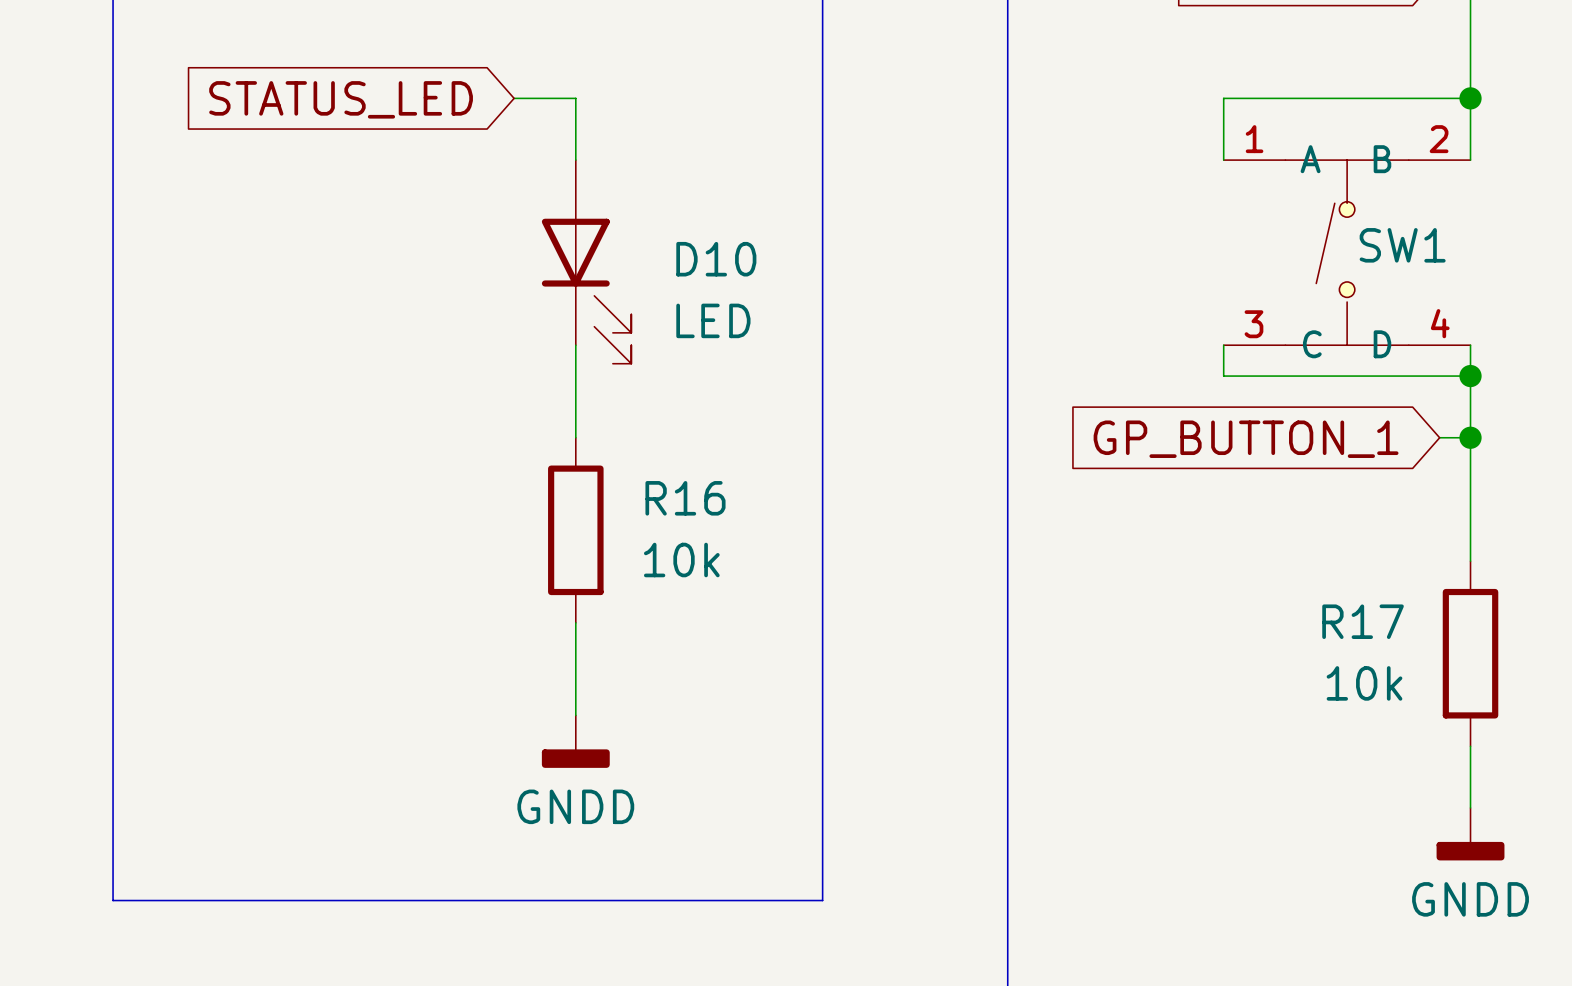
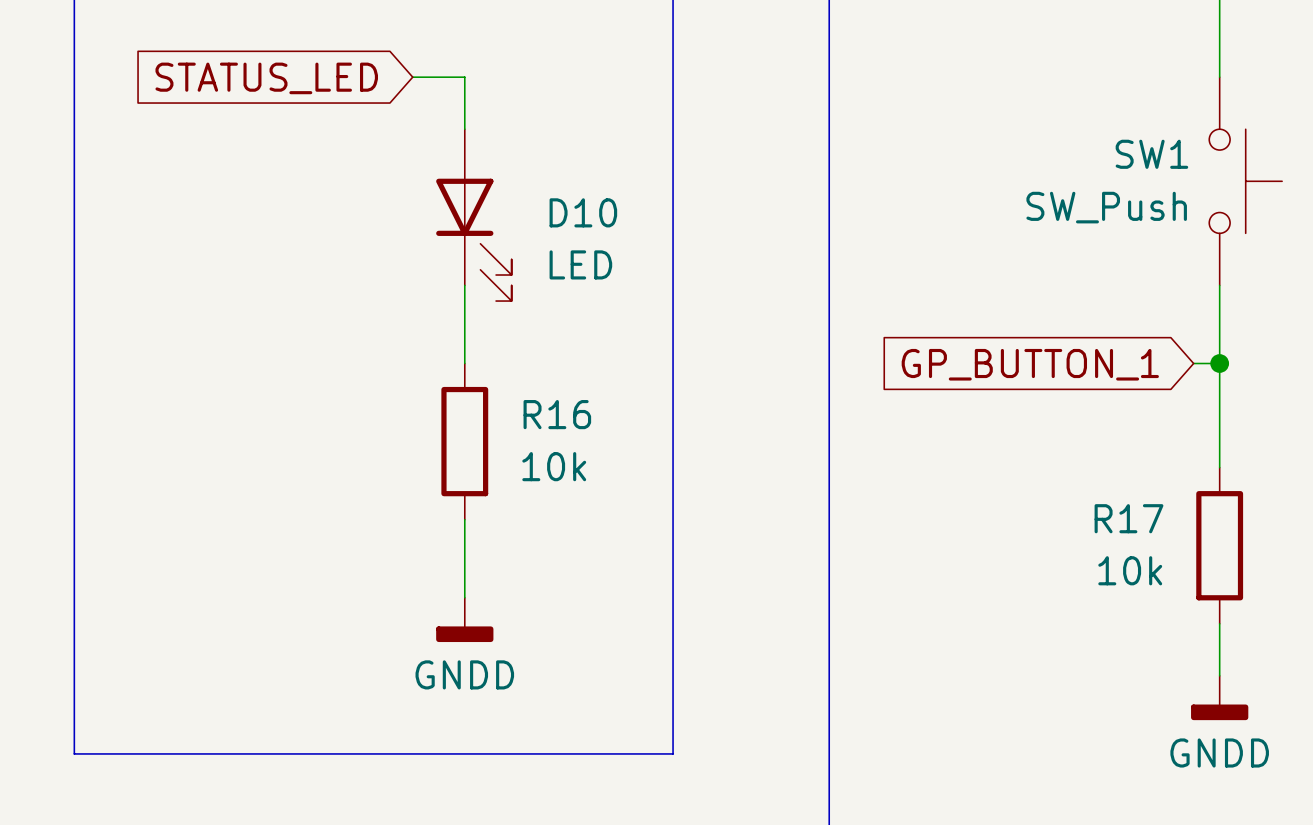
junction: (1470, 98) -> none
wire: (1223, 160) (1223, 98) (1470, 98) (1470, 160) -> none
SW1 symbol: [1223, 160, 1471, 346] -> [1209, 77, 1283, 286]
SW1 name position: SW1 (1402, 245) -> SW1 (1151, 154)
SW1 value: none -> SW_Push (1106, 207)
wire: (1223, 345) (1223, 376) (1470, 376) -> none
junction: (1470, 376) -> none

